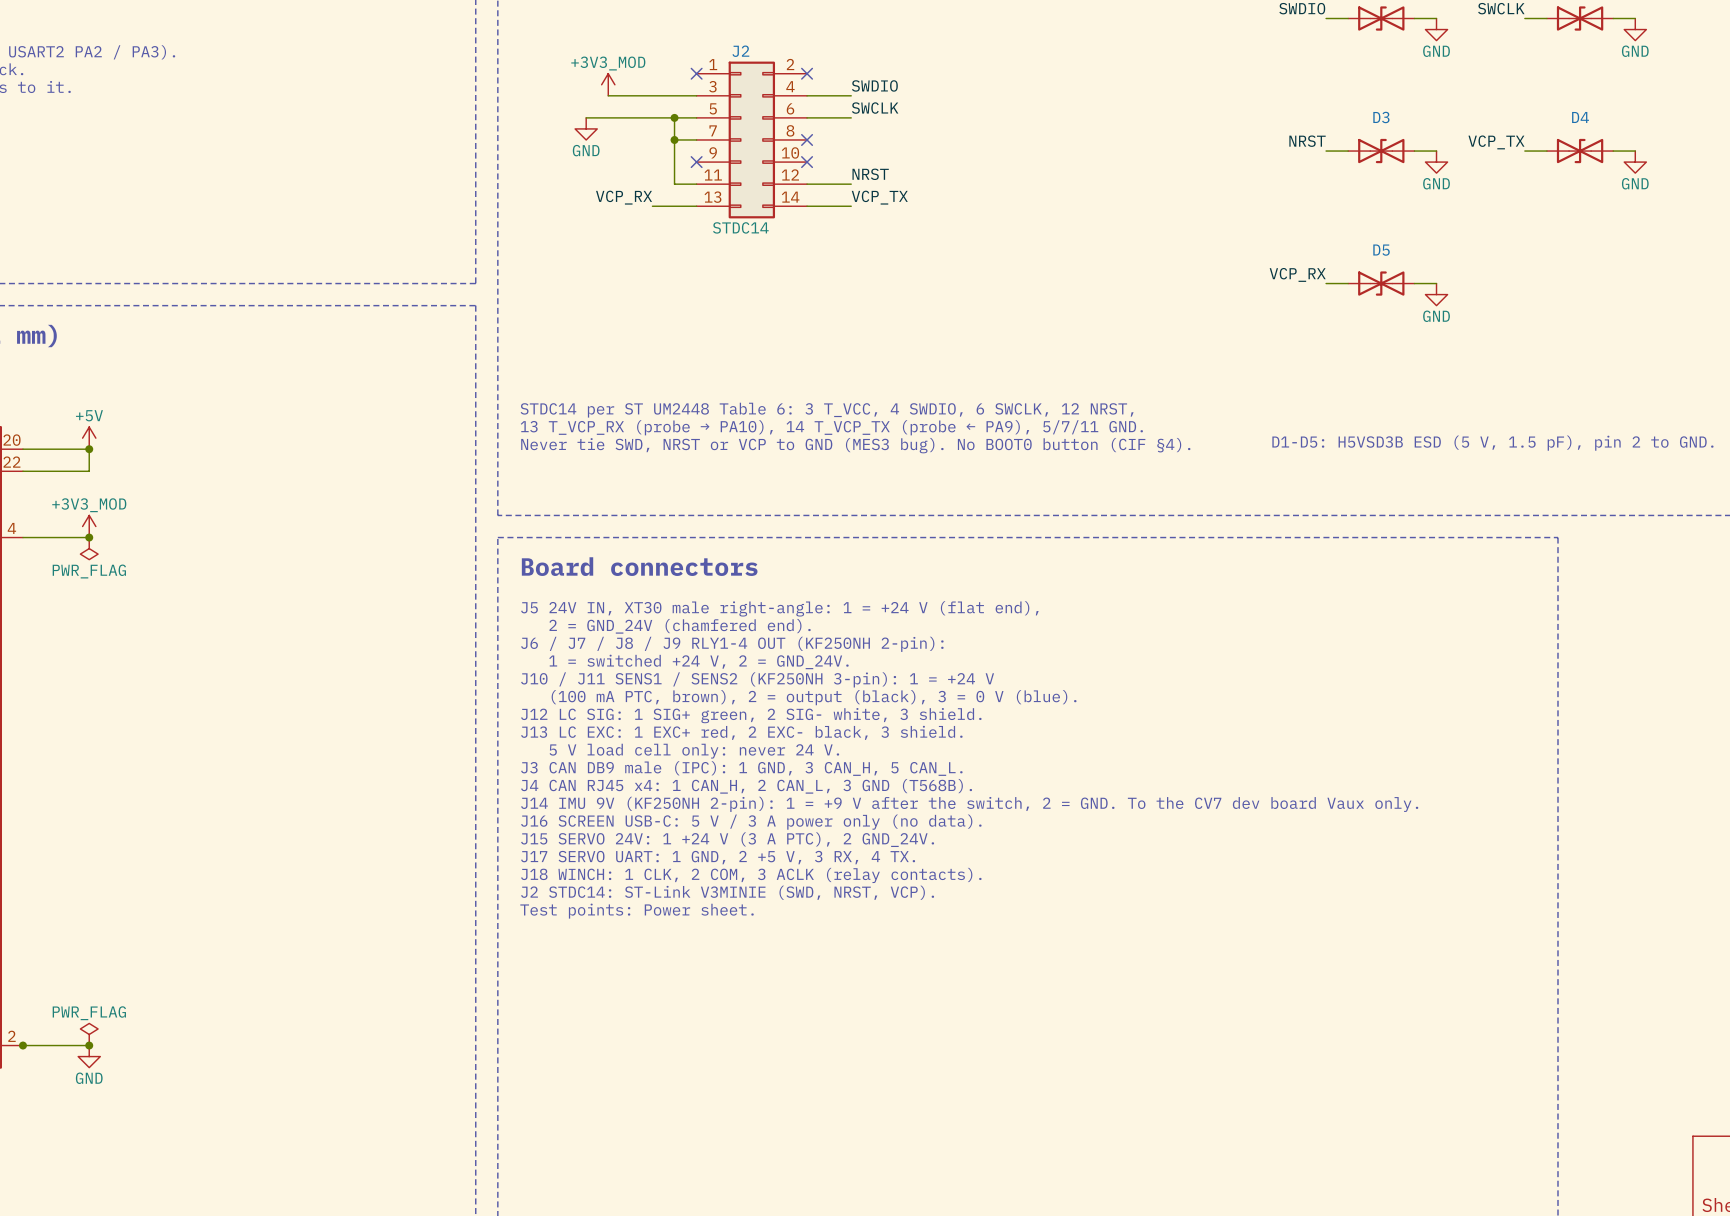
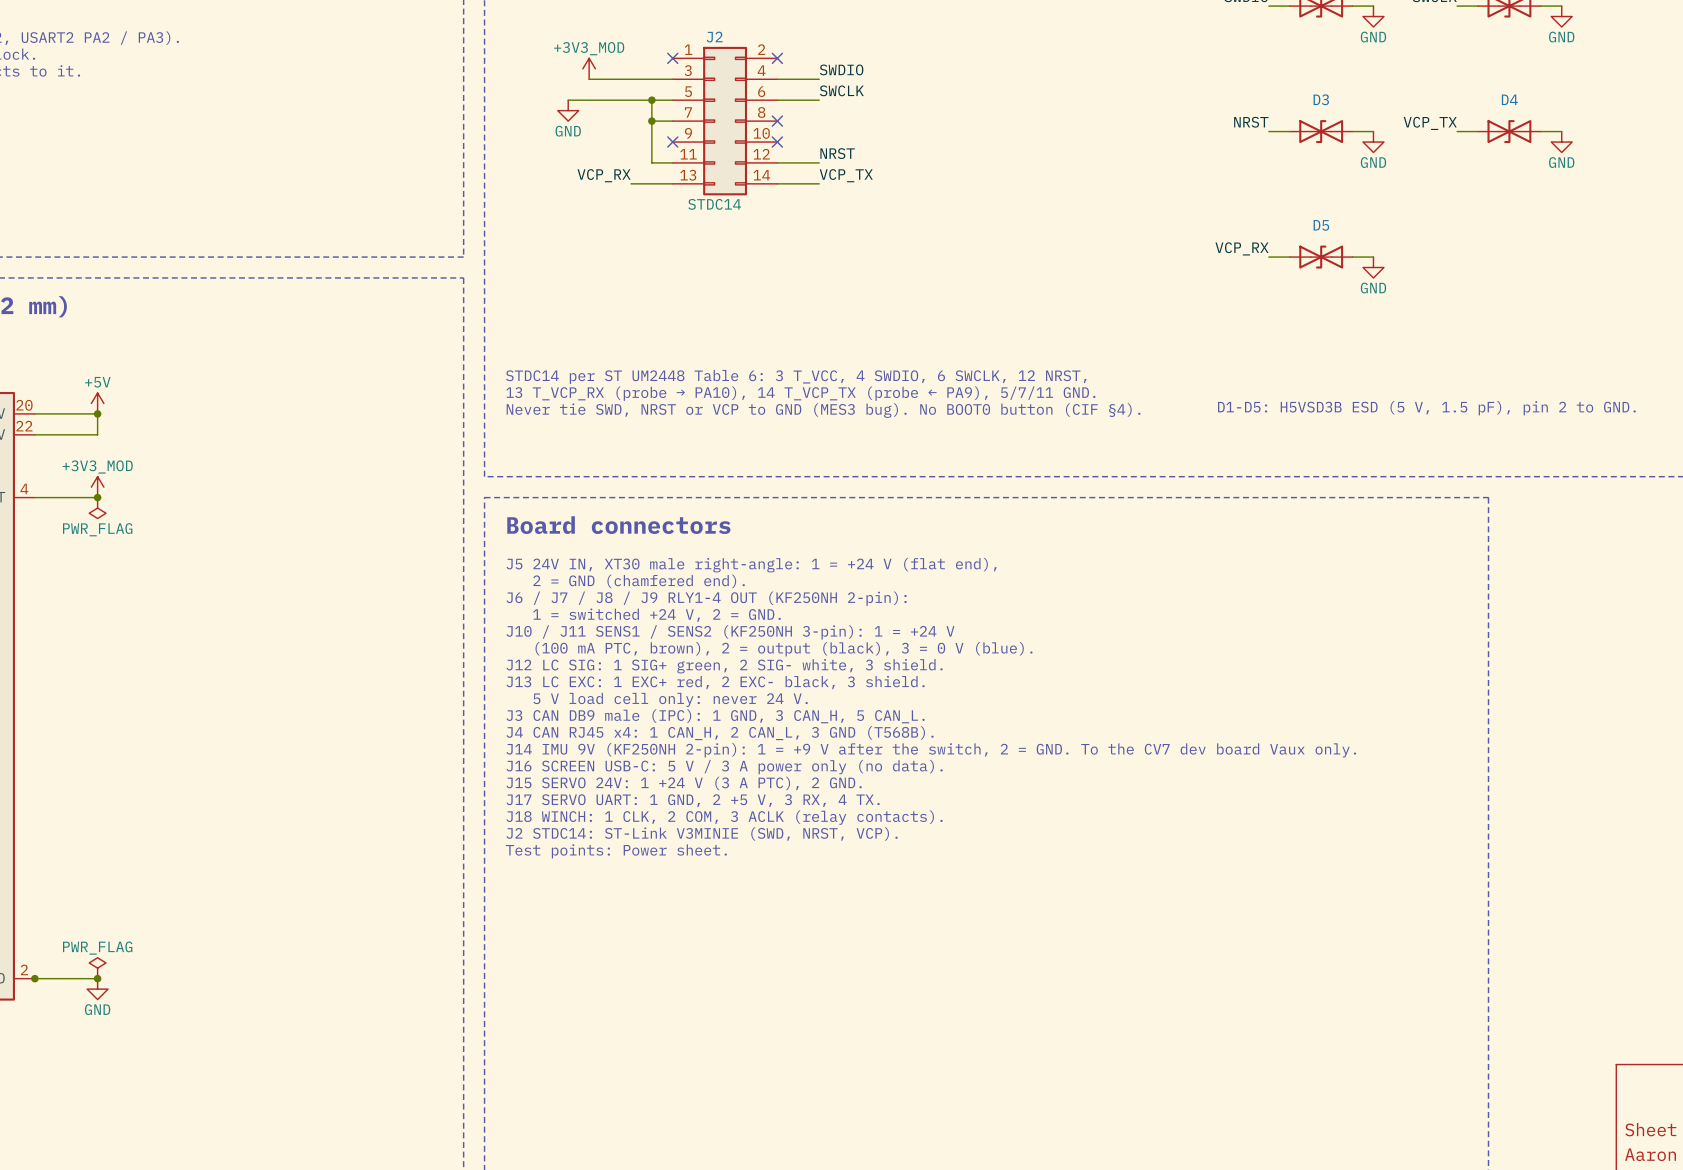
text: 2 = GND_24V (chamfered end). (680, 626) -> 2 = GND (chamfered end). (639, 581)
text: 1 = switched +24 V, 2 = GND_24V. (698, 661) -> 1 = switched +24 V, 2 = GND. (657, 615)
text: J15 SERVO 24V: 1 +24 V (3 A PTC), 2 GND_24V. (727, 839) -> J15 SERVO 24V: 1 +24 V (3 A PTC), 2 GND. (684, 783)

